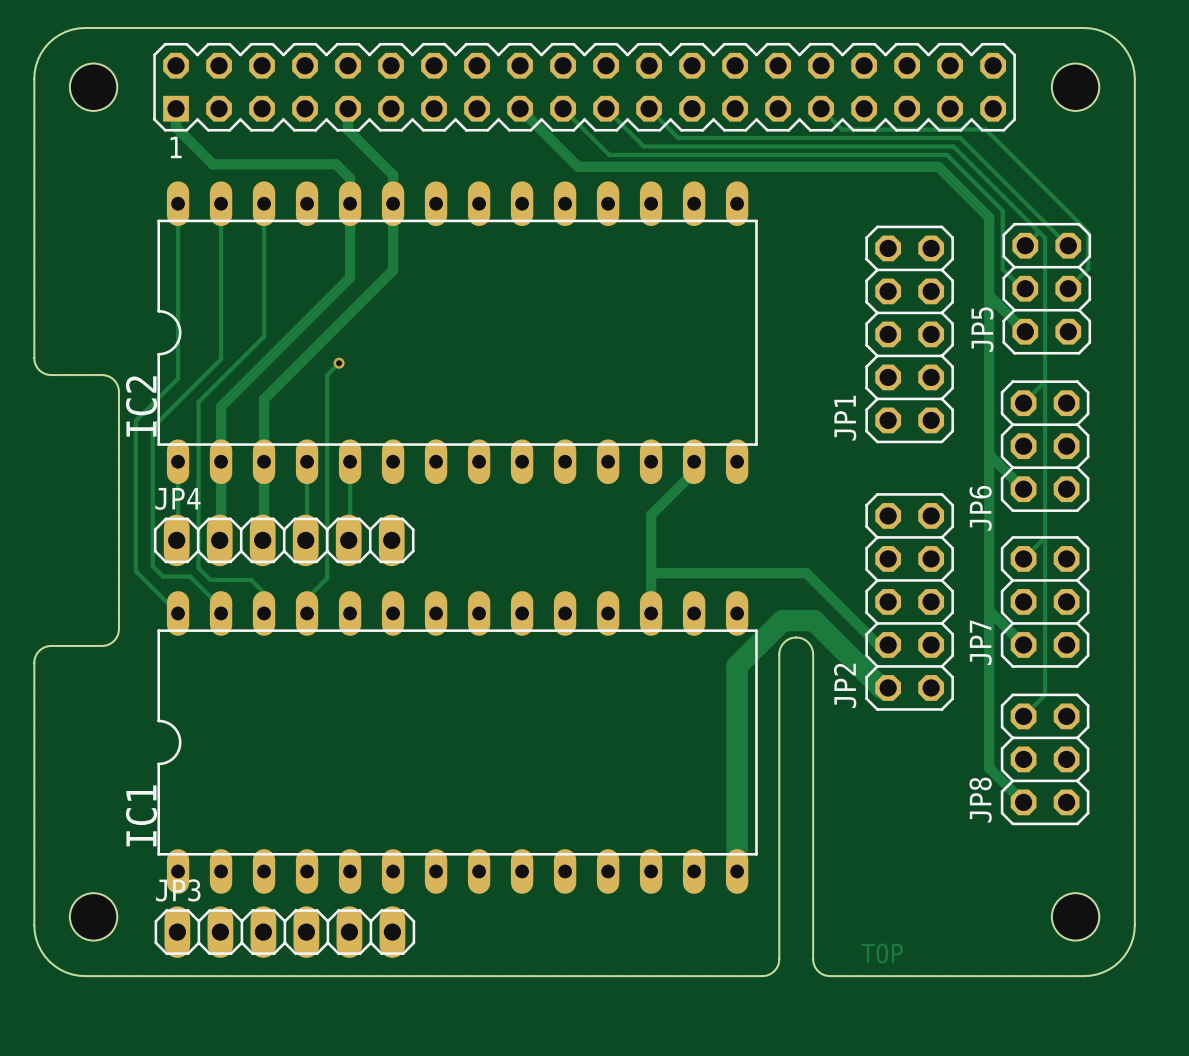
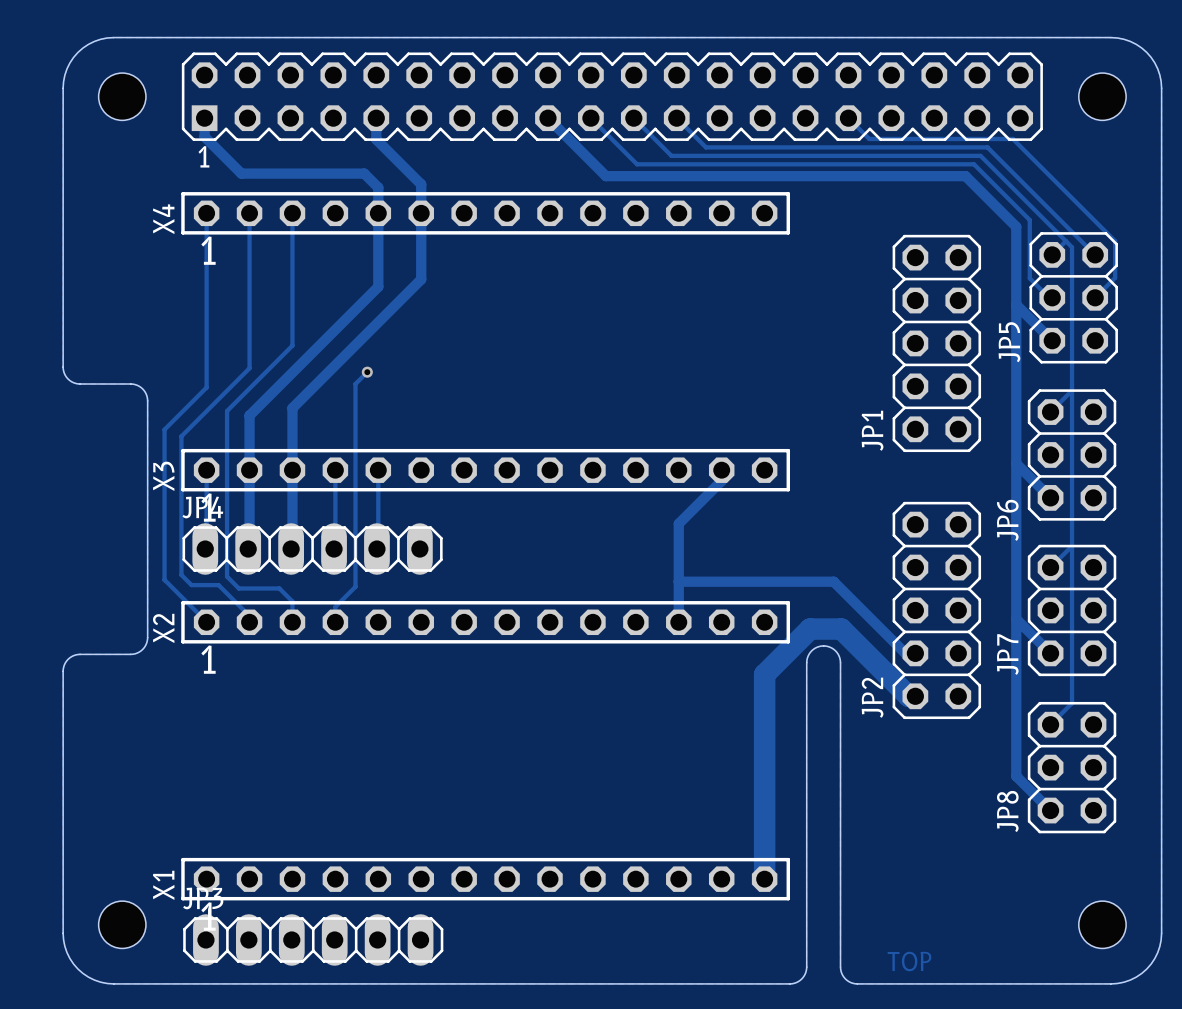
X4: none -> (485, 213)
IC2: (457, 332) -> none
X3: none -> (485, 470)
X2: none -> (485, 622)
IC1: (457, 742) -> none
X1: none -> (485, 879)

